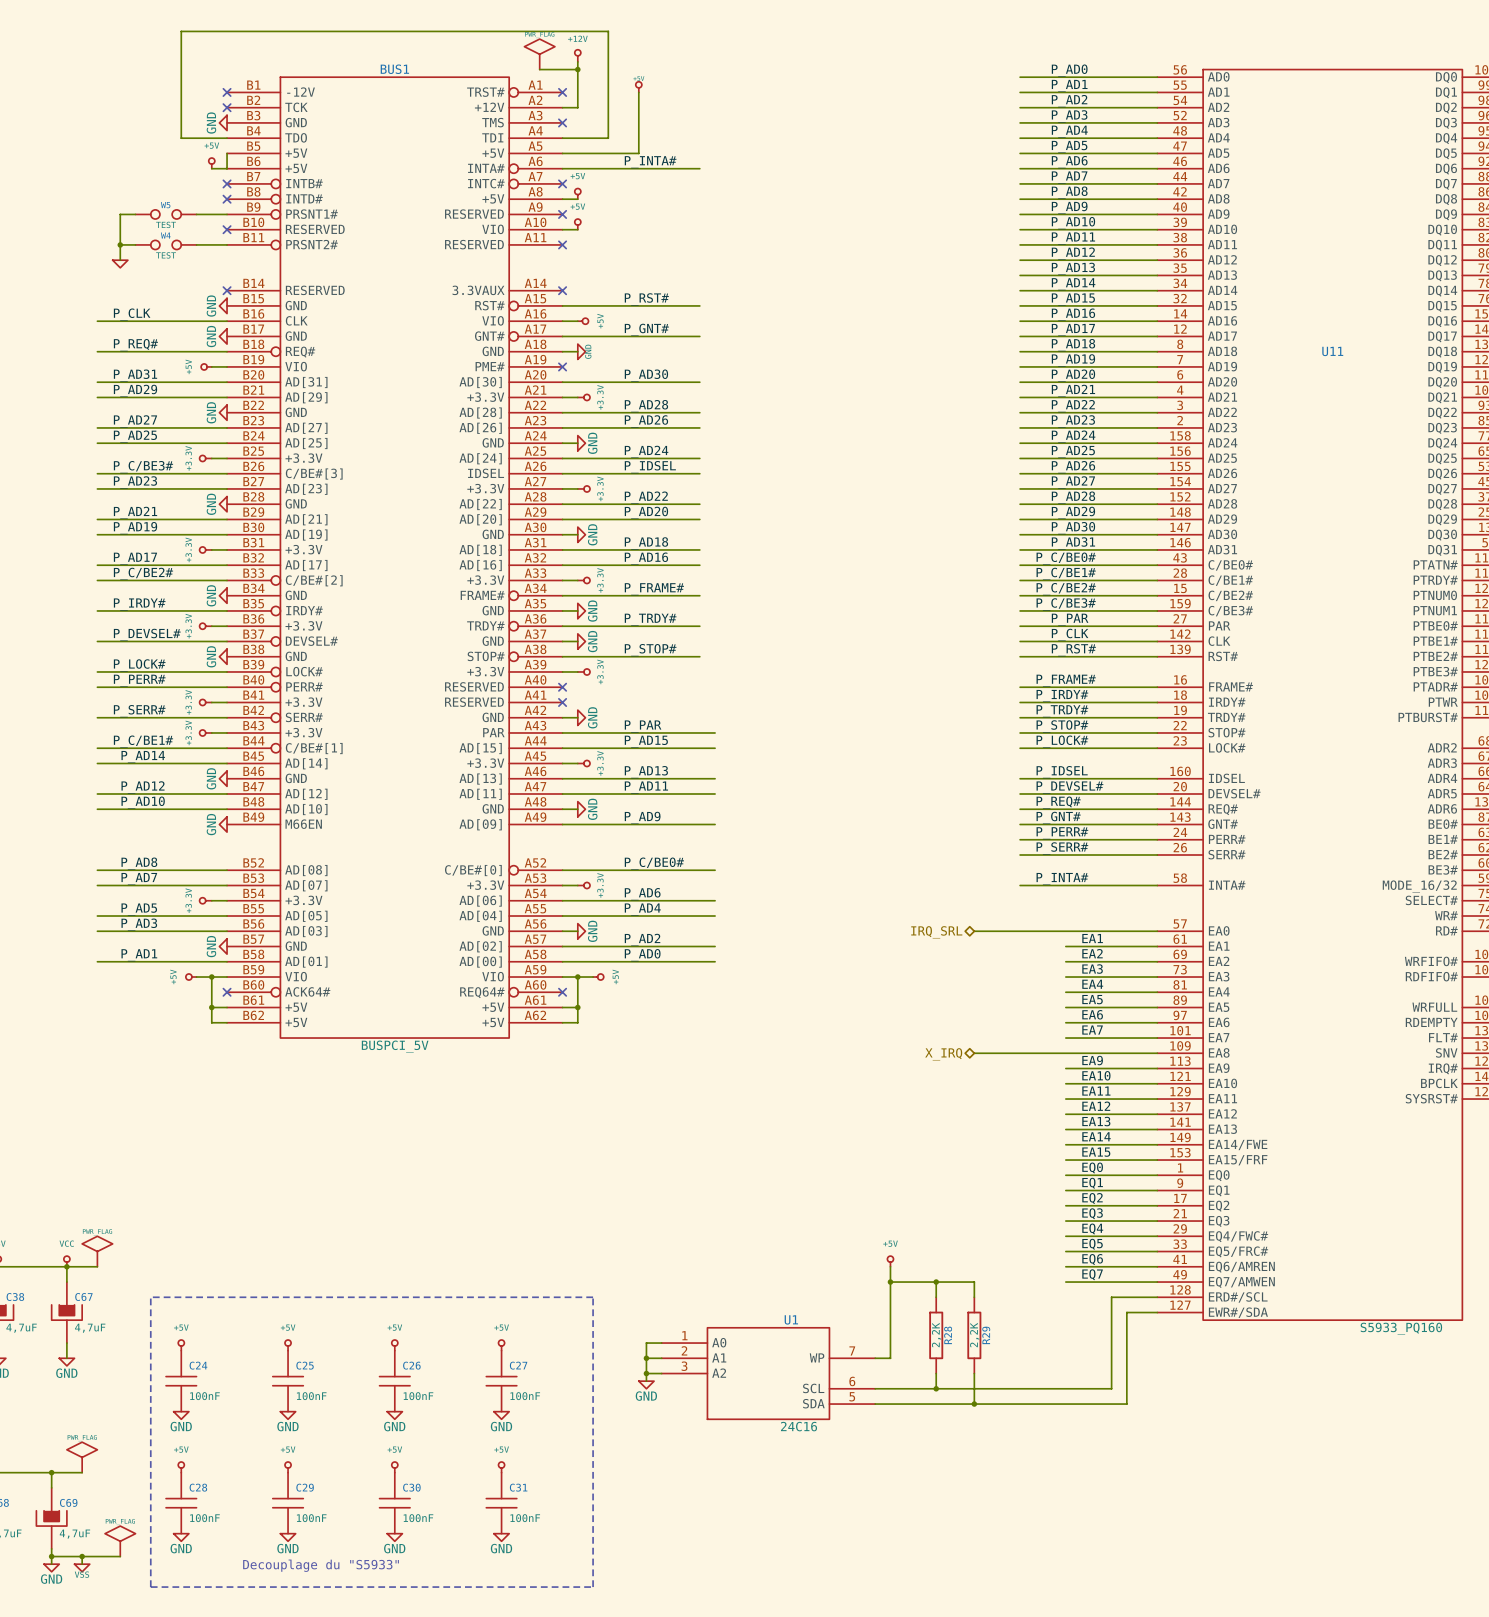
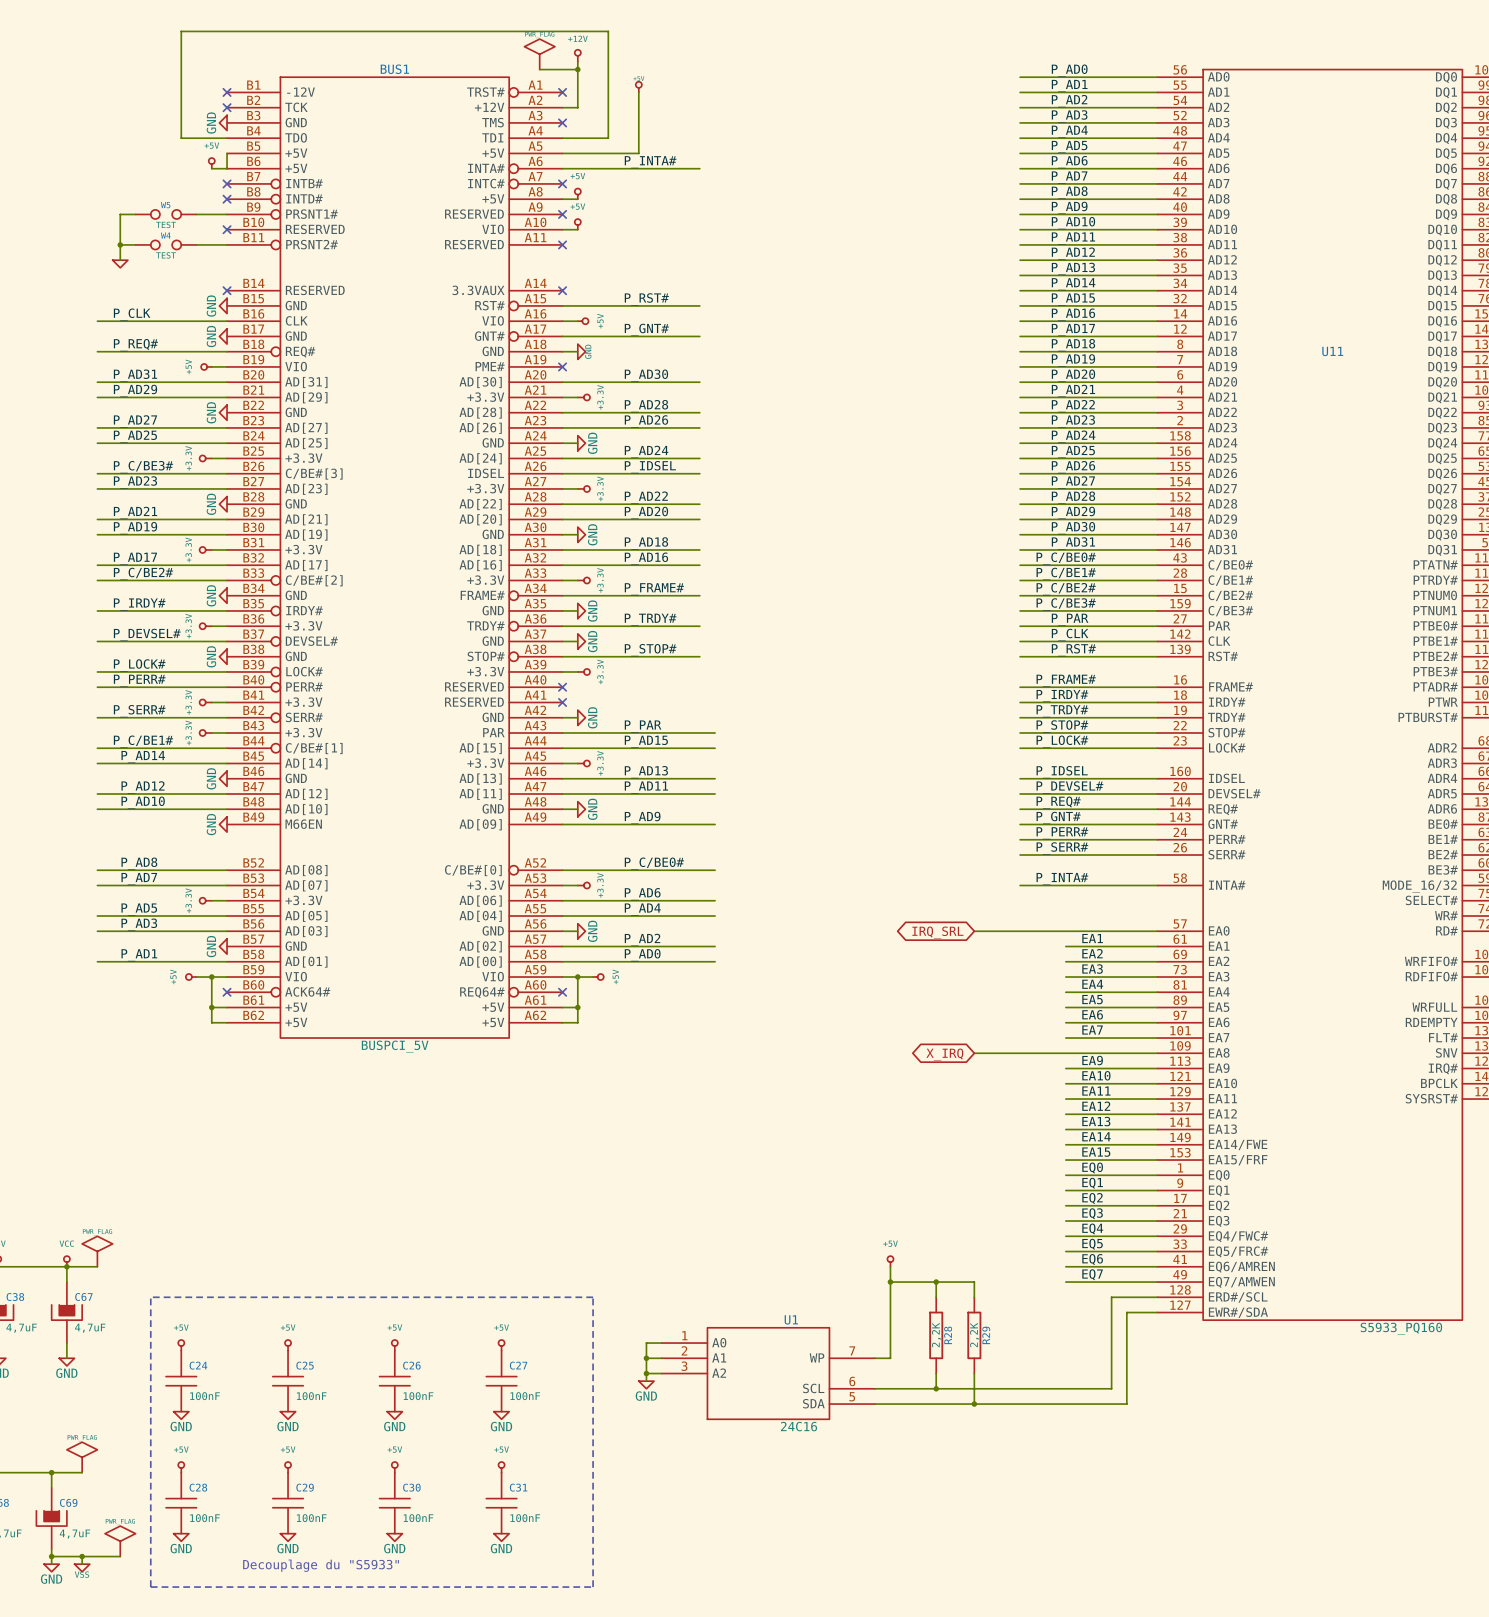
hierarchical label: IRQ_SRL (936, 932) -> none
global label: none -> IRQ_SRL (937, 932)
hierarchical label: X_IRQ (943, 1054) -> none
global label: none -> X_IRQ (944, 1054)

